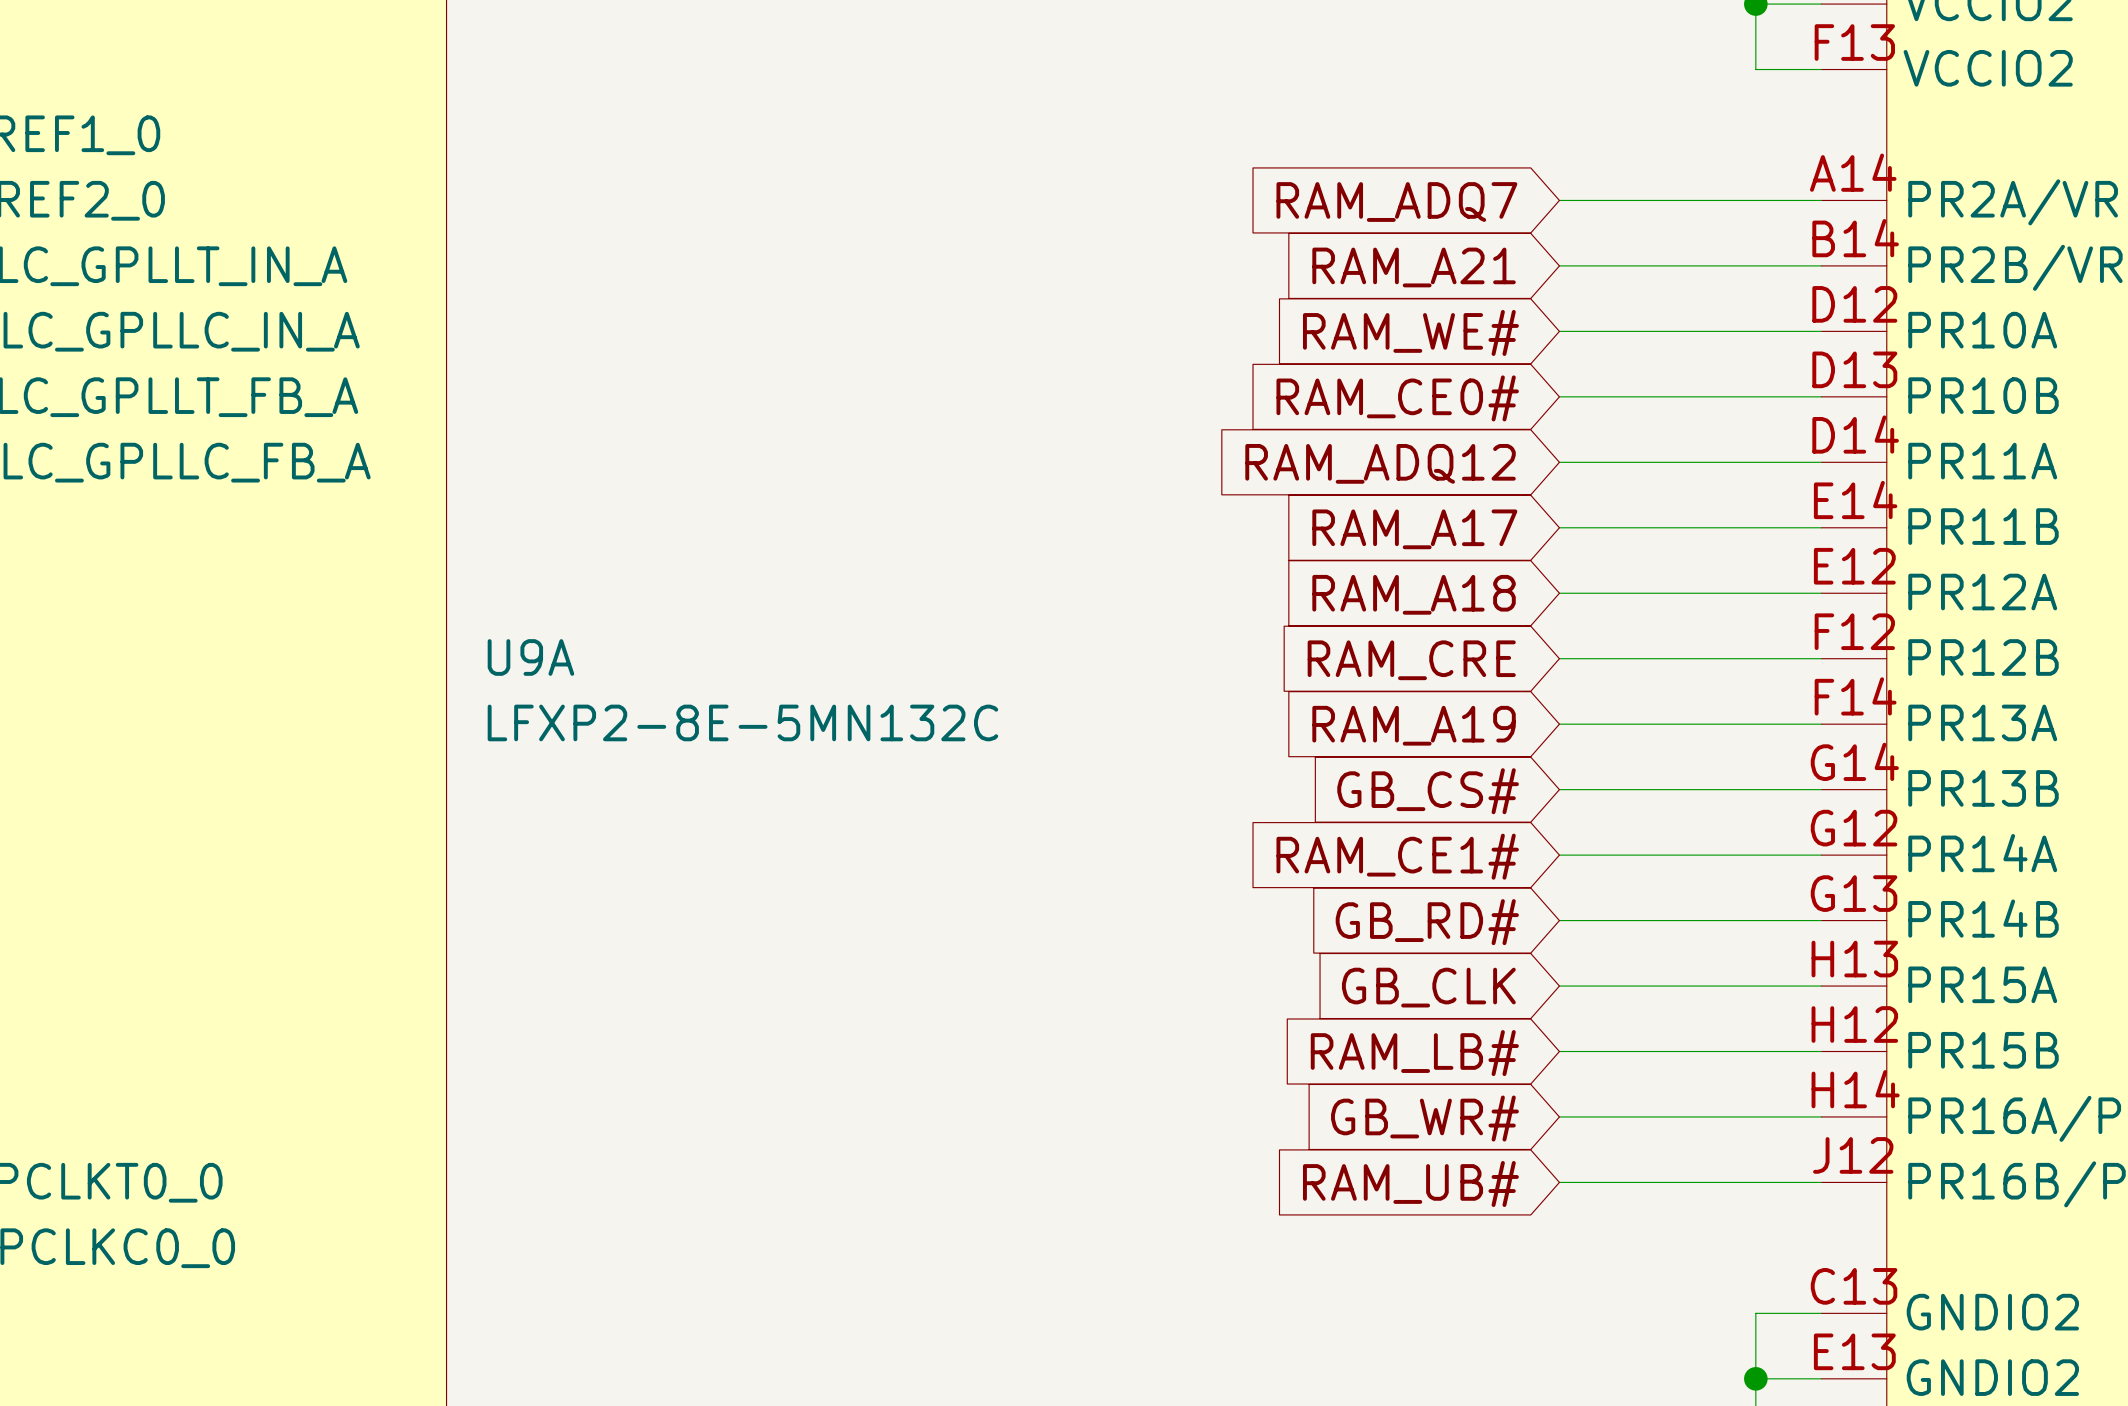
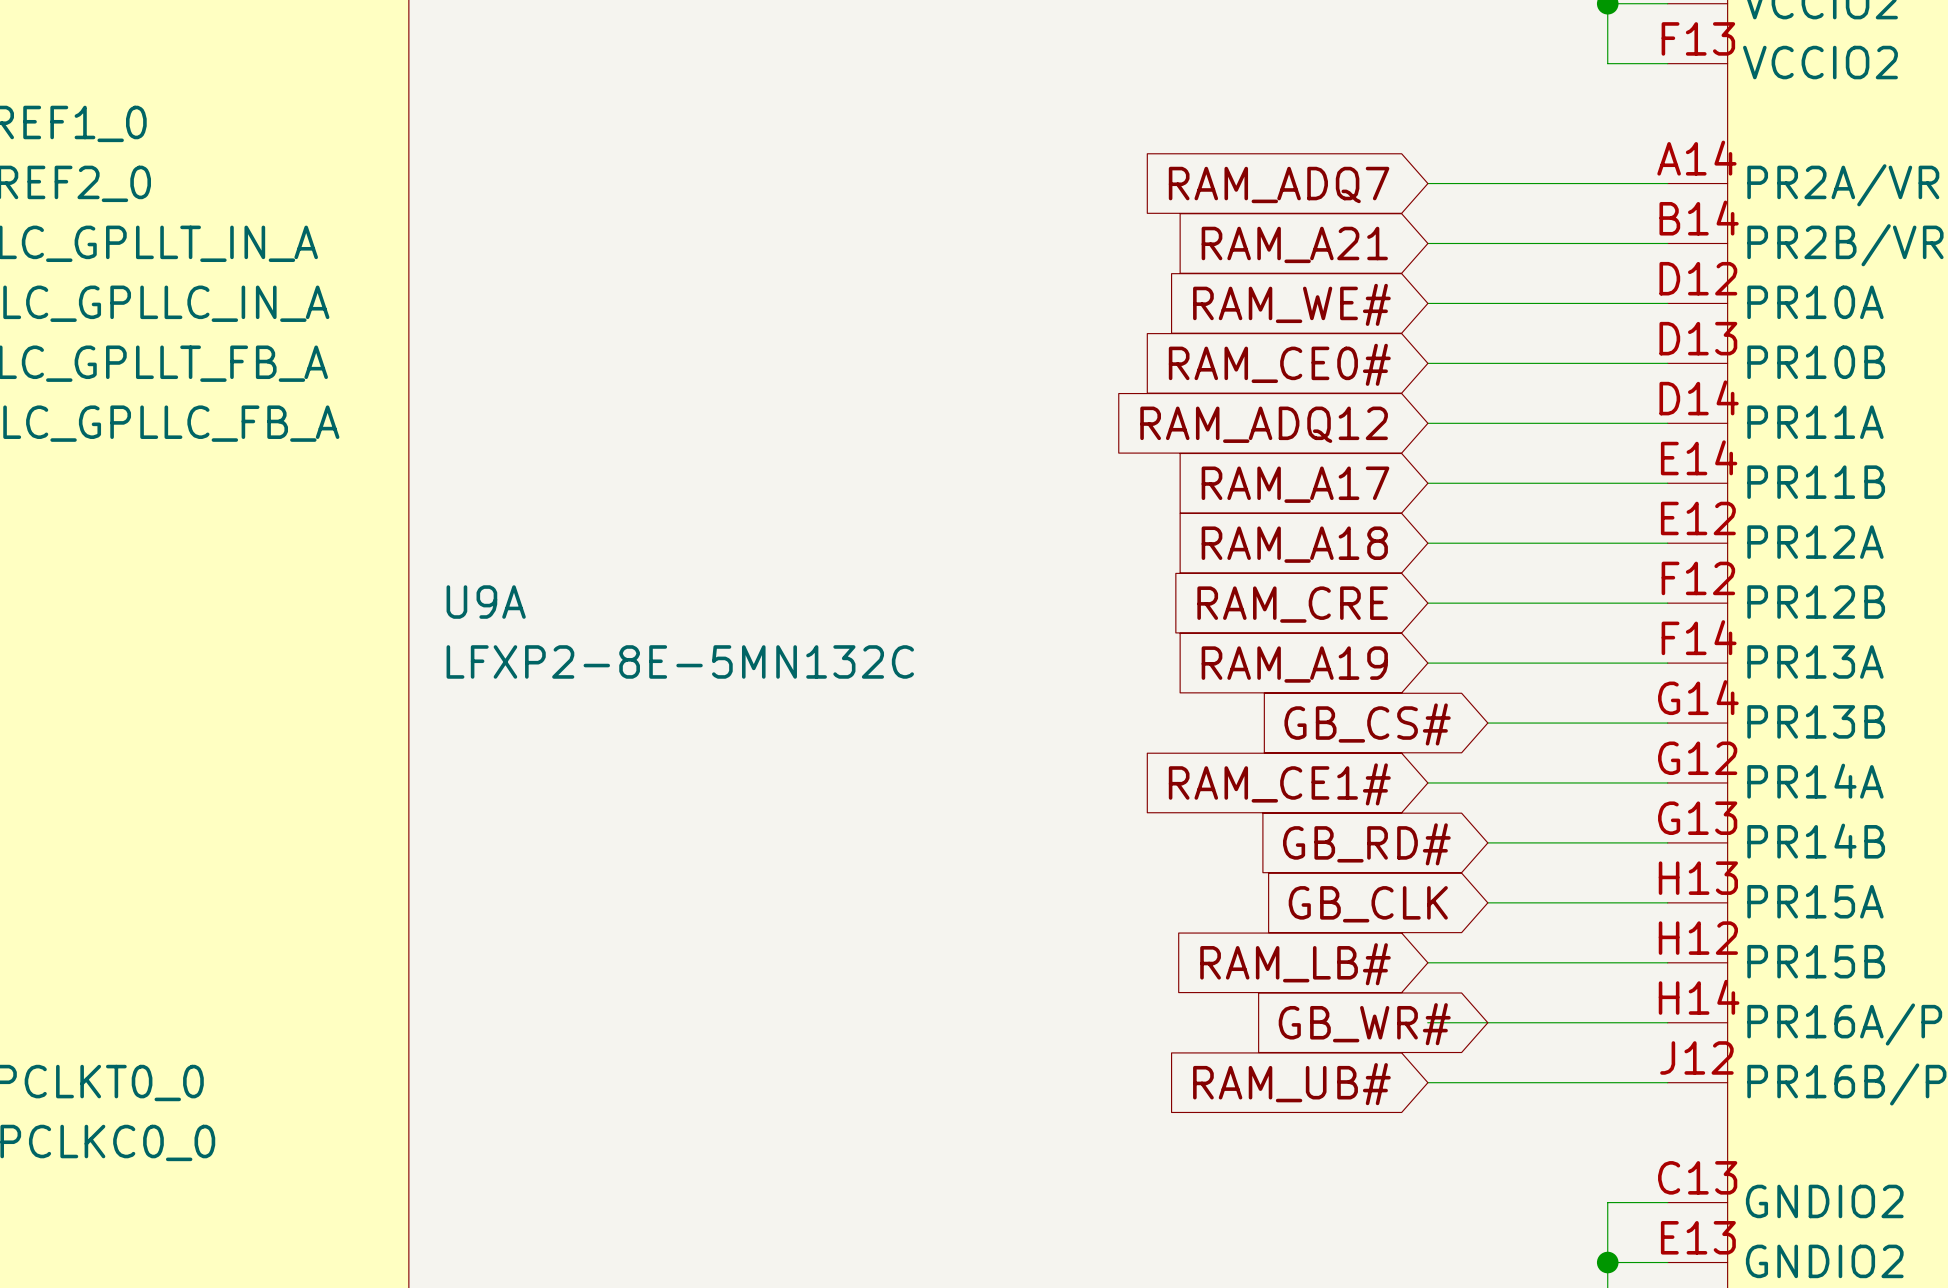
wire: (1559, 789) (1624, 789) -> none
global label position: GB_CS# (1428, 791) -> GB_CS# (1367, 724)
wire: (1559, 920) (1624, 920) -> none
global label position: GB_RD# (1427, 922) -> GB_RD# (1366, 844)
wire: (1559, 986) (1624, 986) -> none
global label position: GB_CLK (1428, 987) -> GB_CLK (1368, 904)
global label position: GB_WR# (1424, 1118) -> GB_WR# (1364, 1024)

